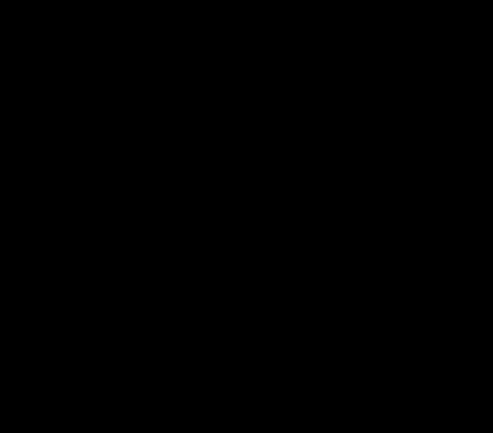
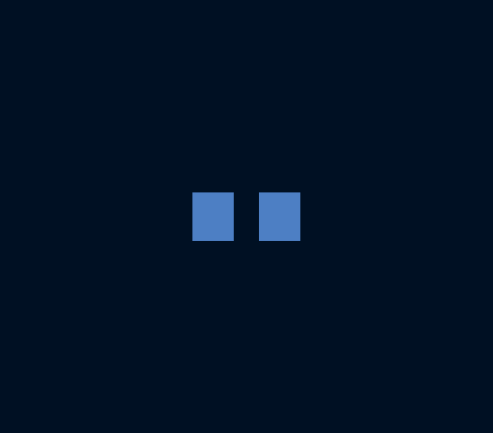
part: none -> (246, 216)

